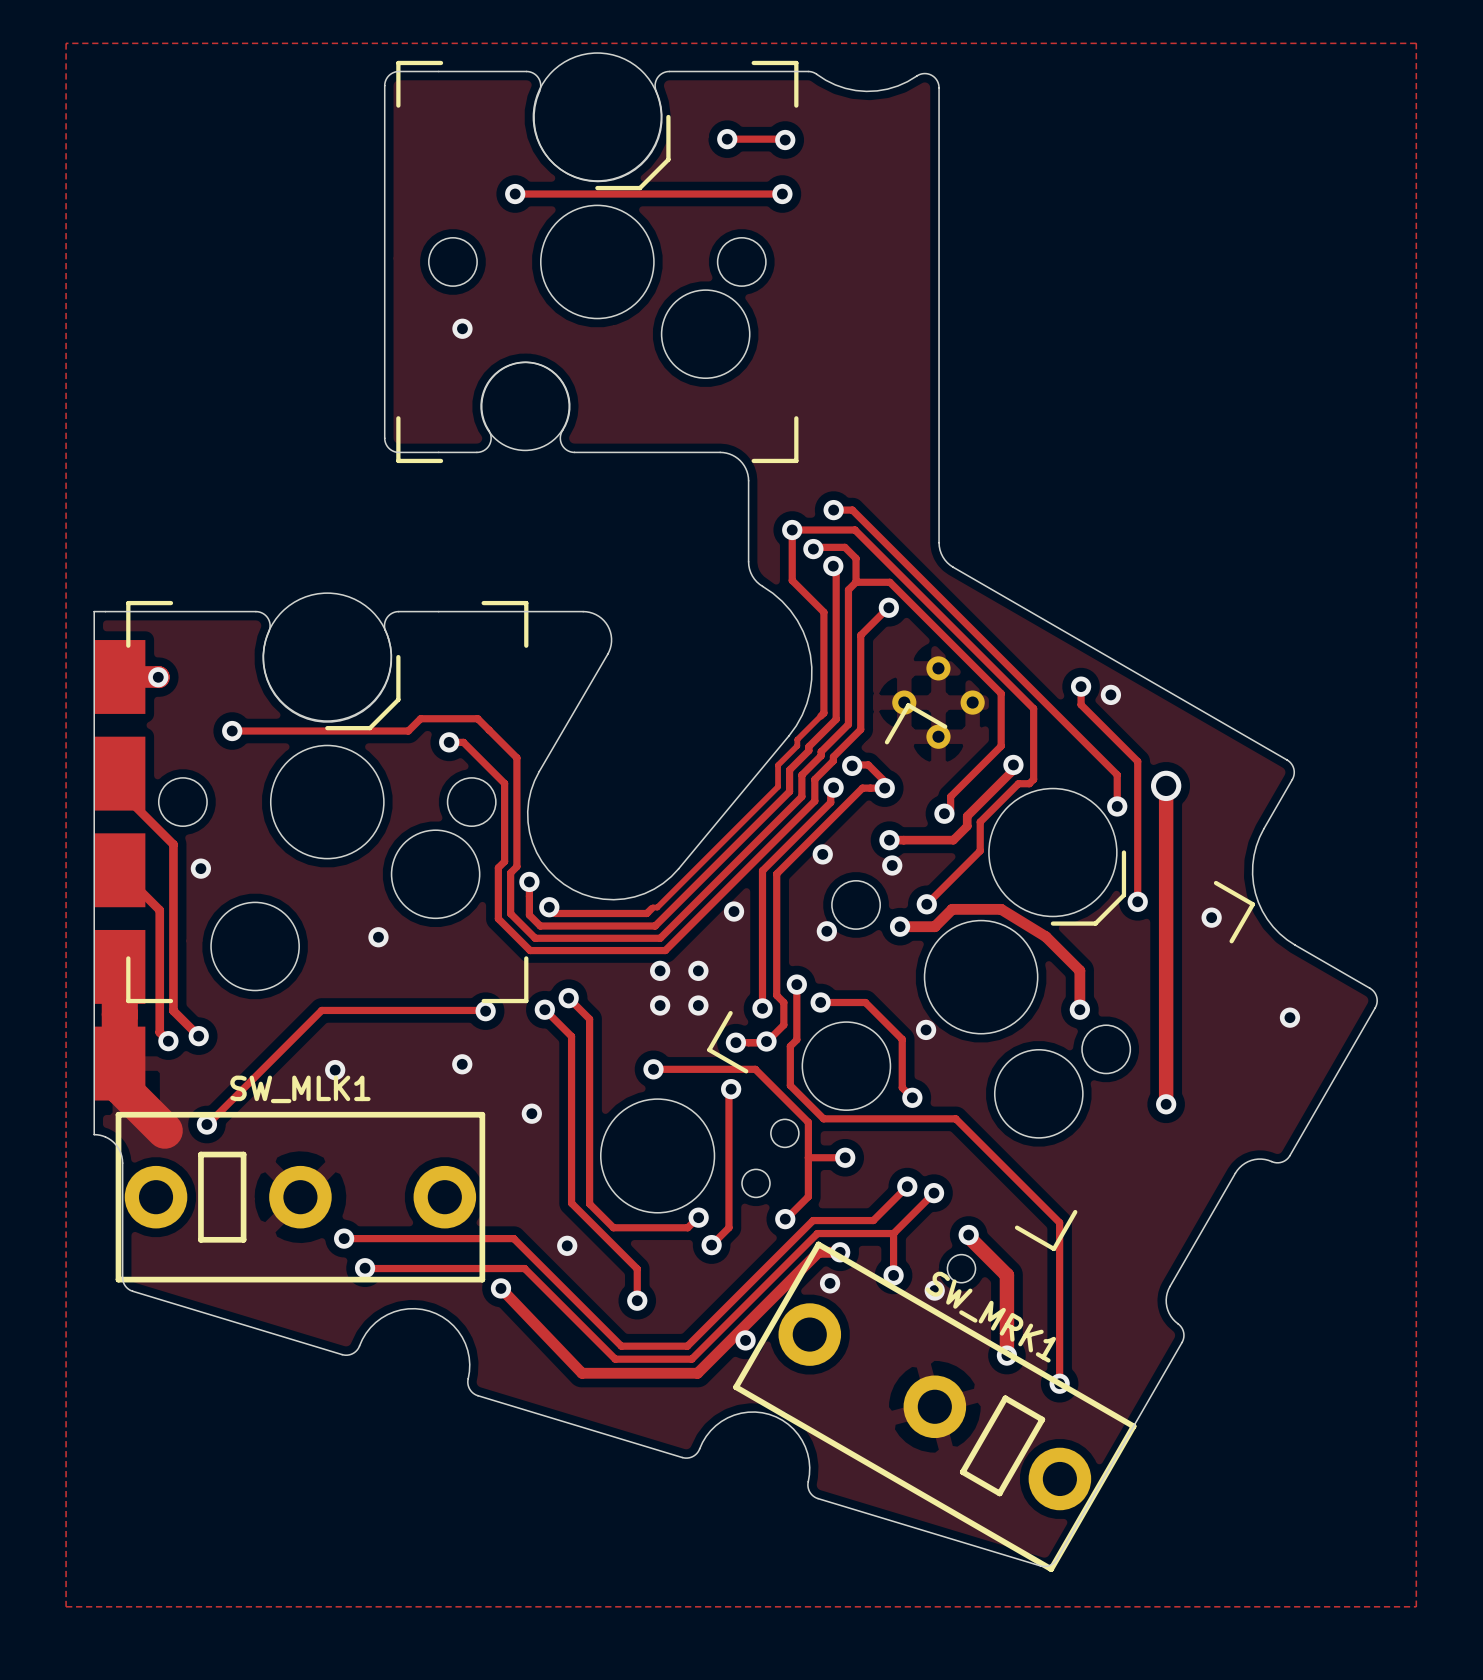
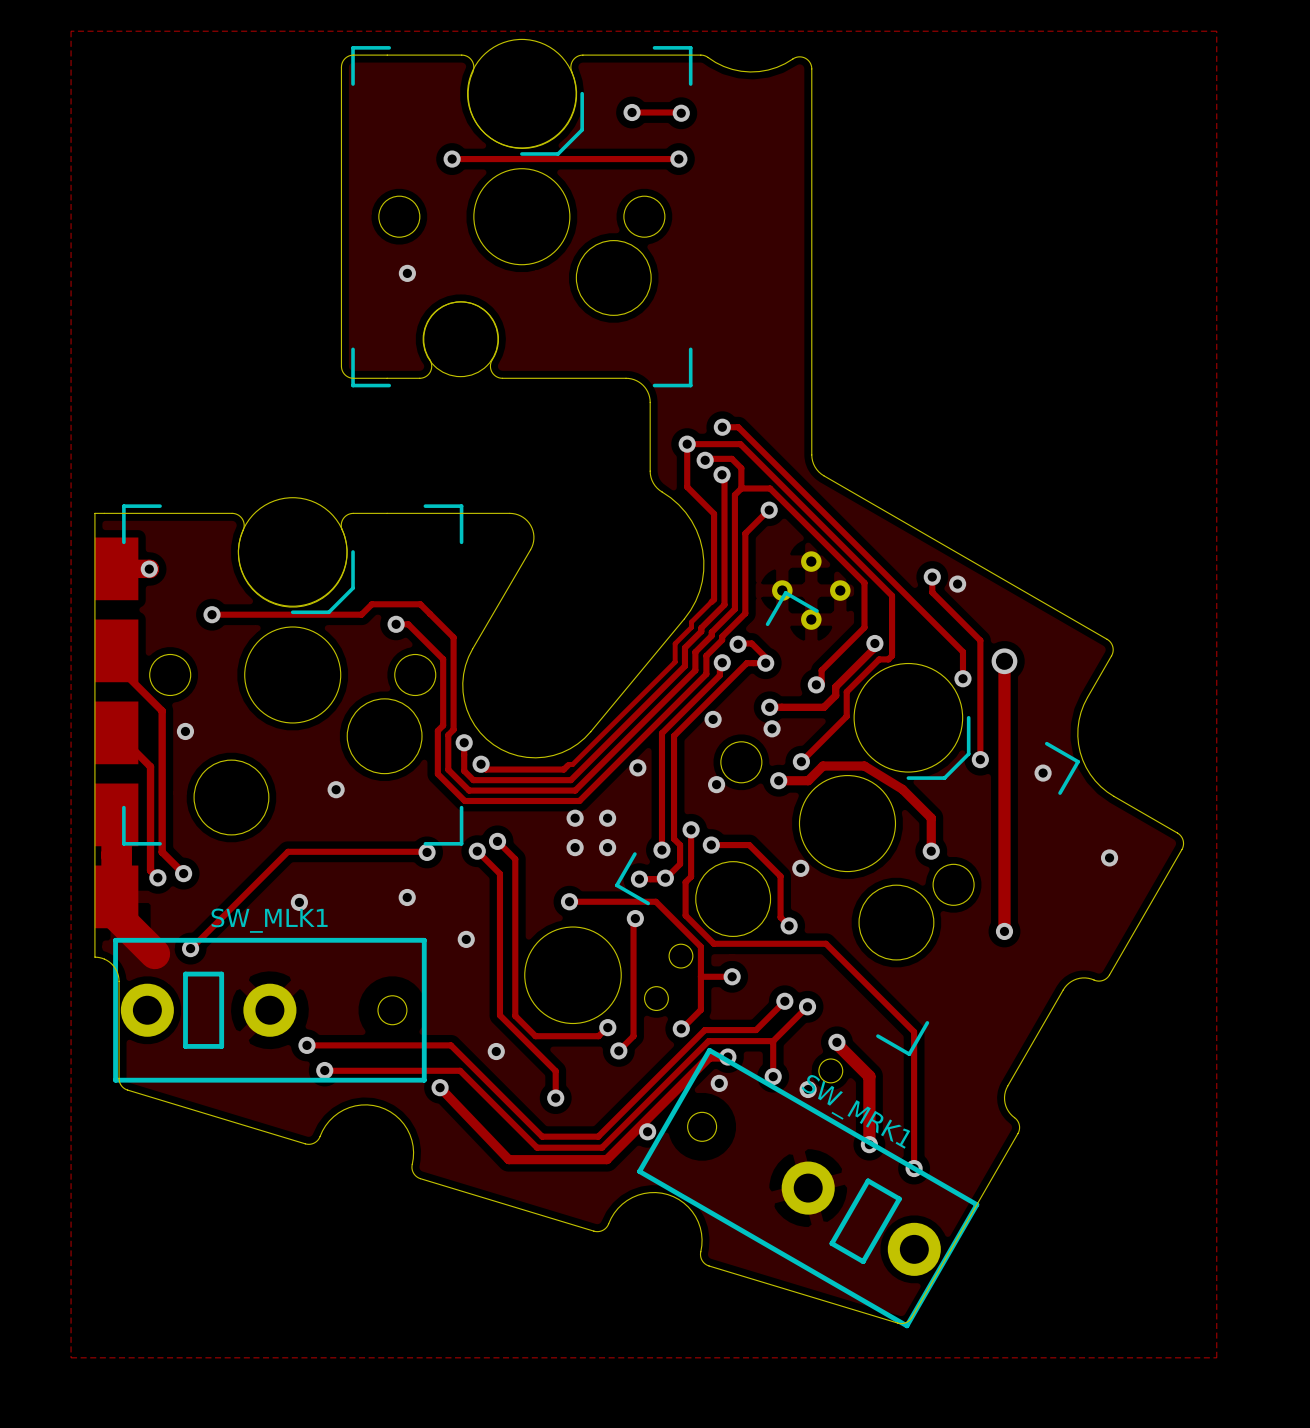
SW_MLK1 footprint: [115, 1111, 486, 1283] -> [113, 937, 427, 1083]
SW_MRK1 footprint: [733, 1241, 1137, 1572] -> [637, 1047, 980, 1329]

